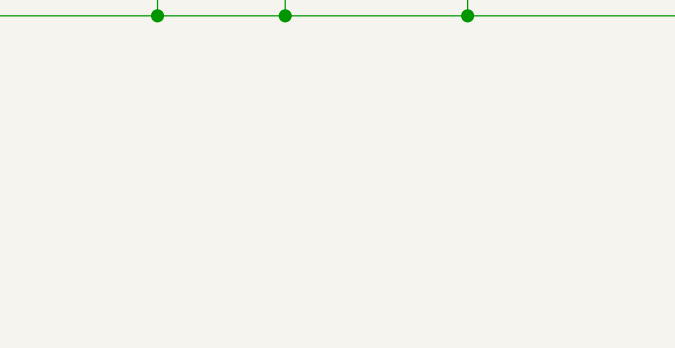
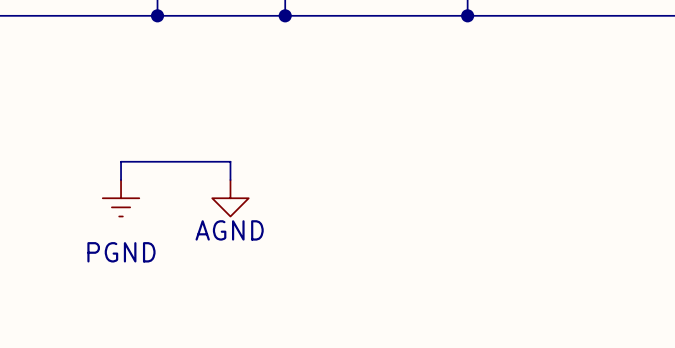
wire: none -> (121, 180) (121, 161) (230, 161) (230, 180)
power symbol: none -> PGND (121, 198)
power symbol: none -> AGND (230, 198)

